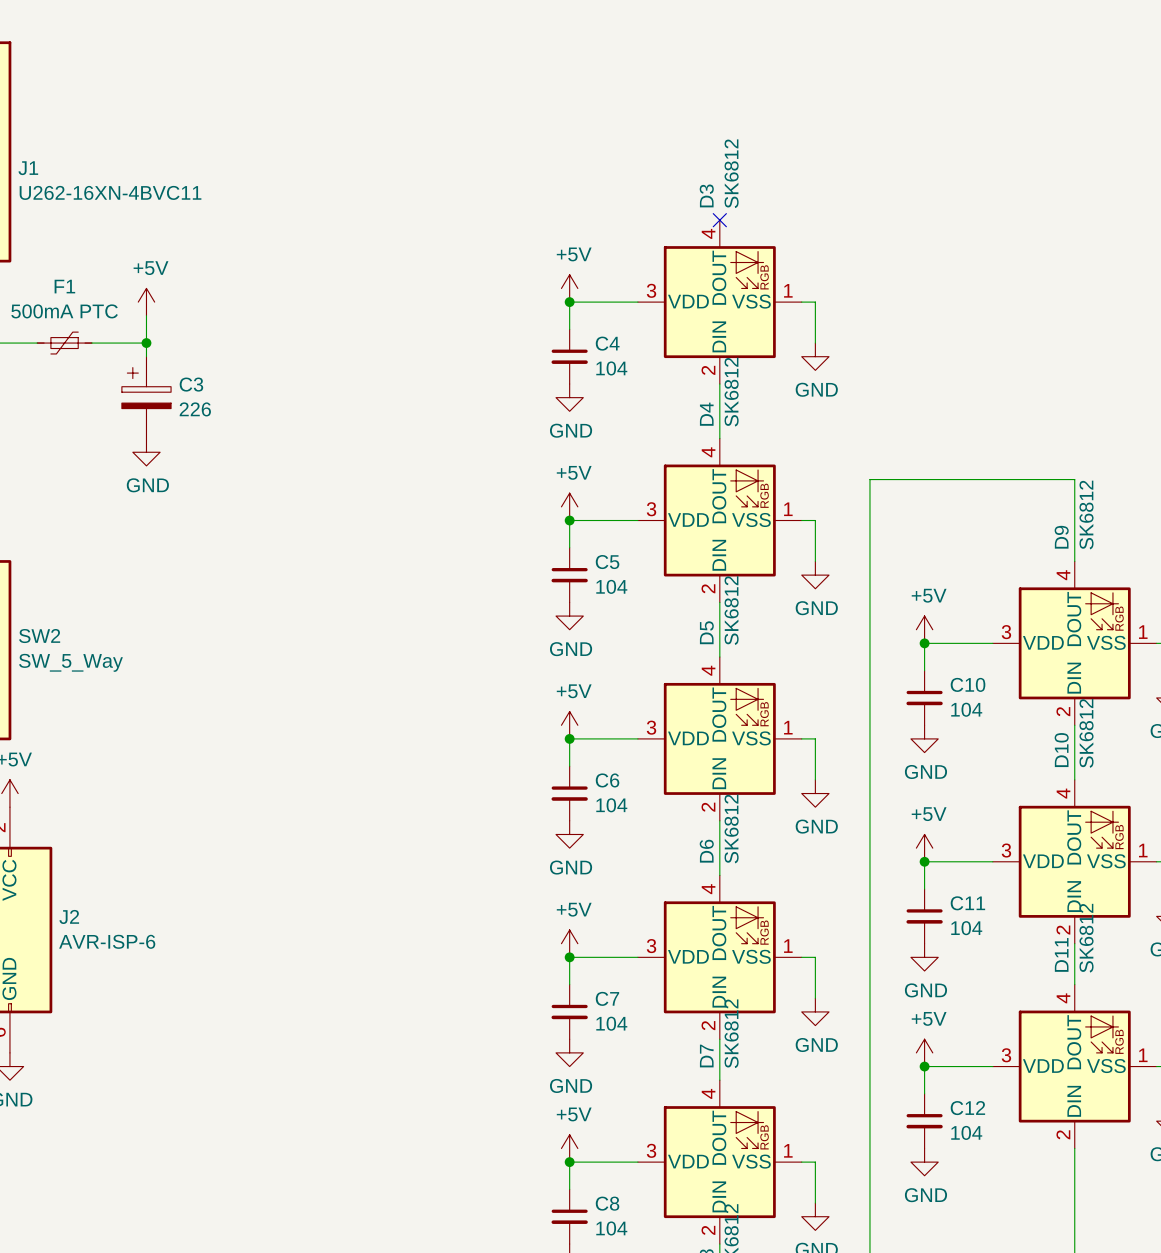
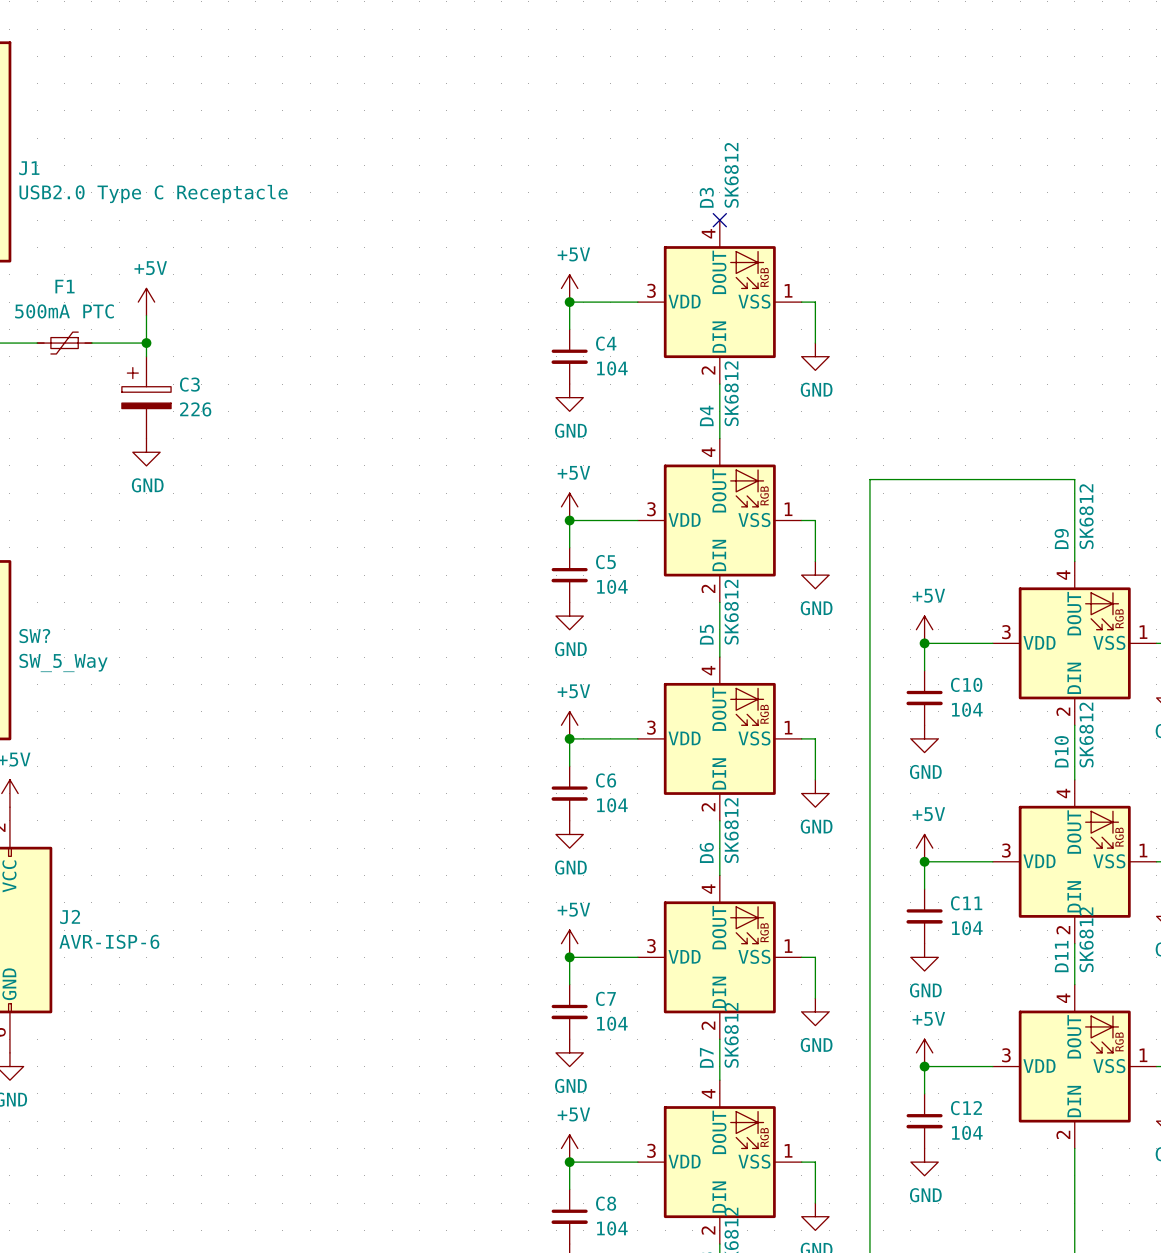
J1 value: U262-16XN-4BVC11 (110, 192) -> USB2.0 Type C Receptacle (153, 193)
SW2 name: SW2 (39, 636) -> SW? (34, 636)

